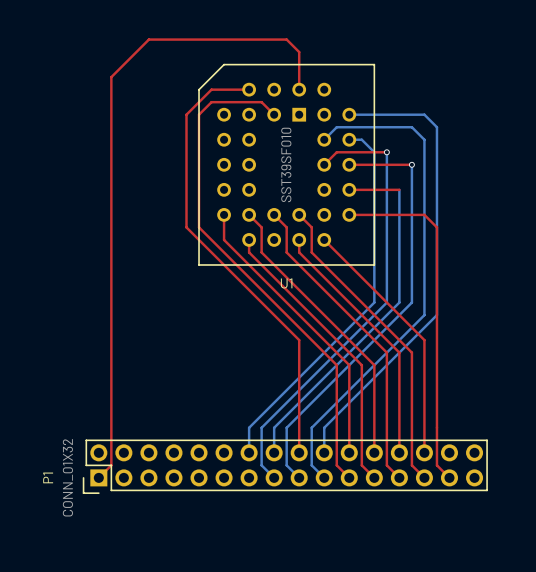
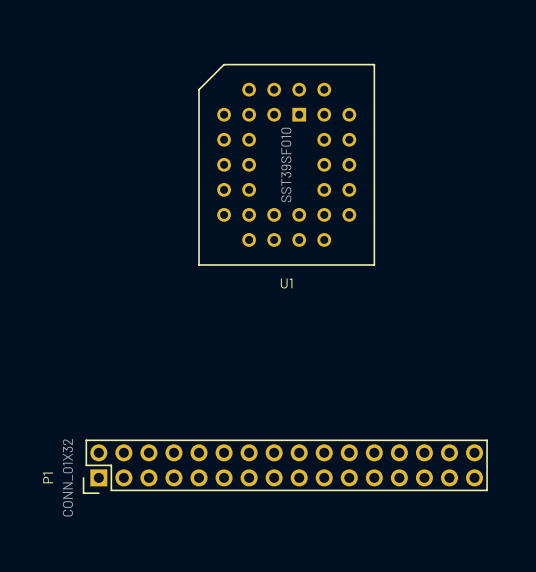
top track: (249, 89) (211, 89) (186, 114) (186, 227) (299, 340) (299, 452) -> none
top track: (299, 89) (299, 52) (286, 39) (148, 39) (111, 77) (111, 465) (98, 477) -> none
top track: (274, 114) (261, 102) (211, 102) (199, 114) (199, 227) (336, 365) (336, 465) (349, 477) -> none
bottom track: (349, 114) (424, 114) (436, 127) (436, 315) (324, 427) (324, 452) -> none
bottom track: (324, 139) (336, 127) (411, 127) (424, 139) (424, 315) (311, 427) (311, 465) (324, 477) -> none
bottom track: (349, 139) (361, 139) (374, 152) (374, 302) (249, 427) (249, 452) -> none
top track: (386, 152) (336, 152) (324, 164) -> none
bottom track: (386, 152) (386, 302) (261, 427) (261, 465) (274, 477) -> none
via: (386, 152) -> none
top track: (349, 164) (411, 164) -> none
bottom track: (411, 164) (411, 302) (286, 427) (286, 465) (299, 477) -> none
via: (411, 164) -> none
top track: (349, 189) (399, 189) -> none
bottom track: (399, 189) (399, 302) (274, 427) (274, 452) -> none
top track: (224, 214) (224, 239) (349, 365) (349, 452) -> none
top track: (249, 214) (261, 227) (261, 252) (374, 365) (374, 452) -> none
top track: (274, 214) (286, 227) (286, 252) (386, 352) (386, 465) (399, 477) -> none
top track: (299, 214) (311, 227) (311, 252) (411, 352) (411, 465) (424, 477) -> none
top track: (349, 214) (424, 214) (436, 227) (436, 465) (449, 477) -> none
top track: (249, 239) (249, 252) (361, 365) (361, 465) (374, 477) -> none
top track: (299, 239) (299, 252) (399, 352) (399, 452) -> none
top track: (324, 239) (424, 340) (424, 452) -> none

